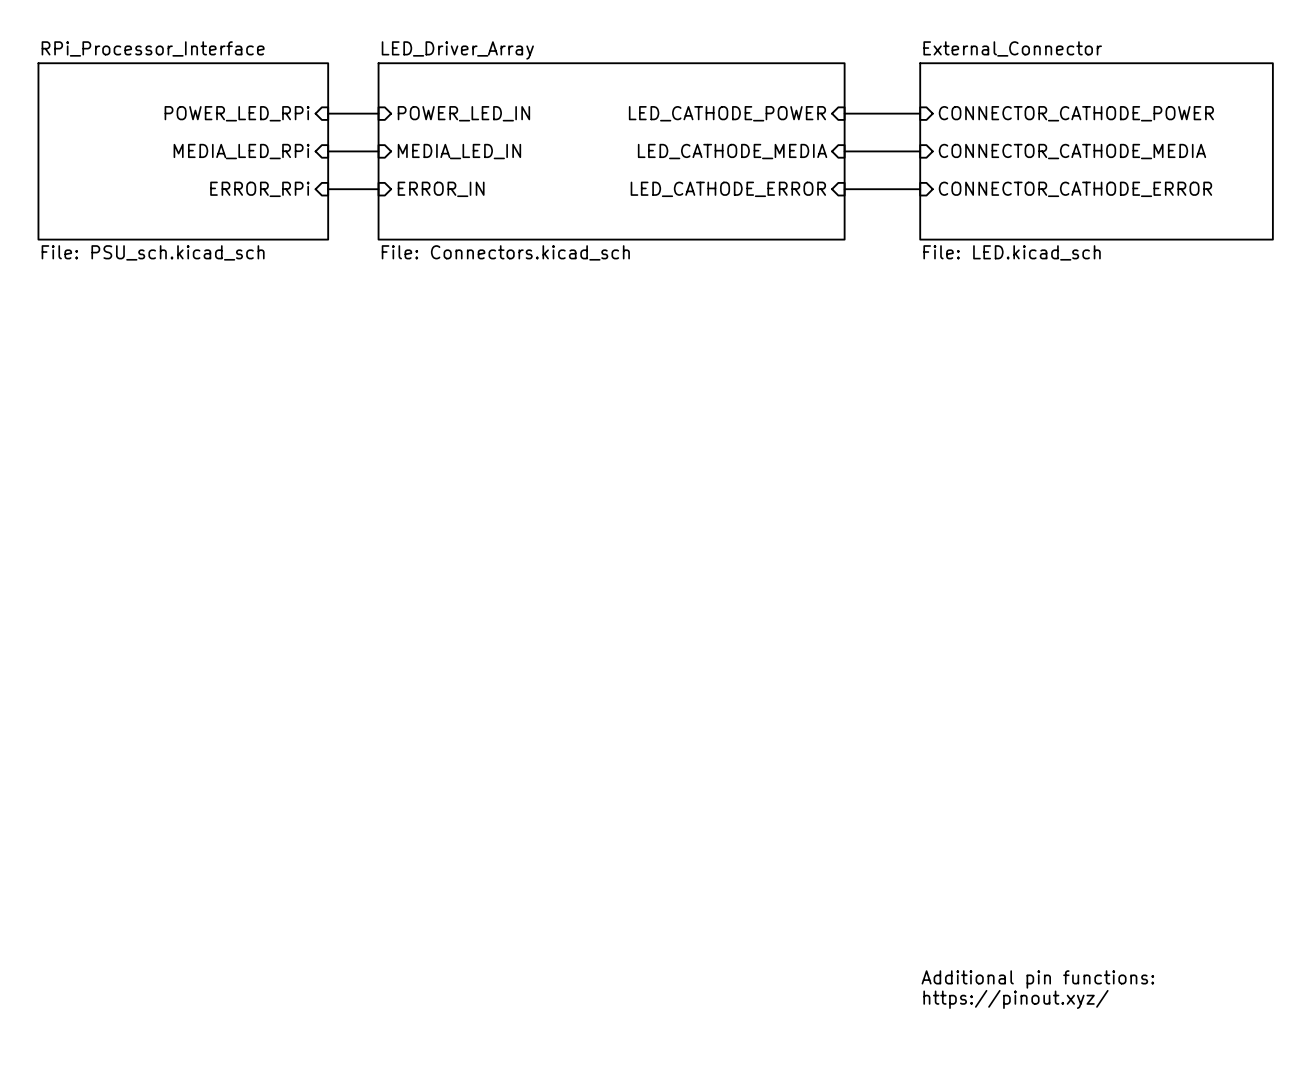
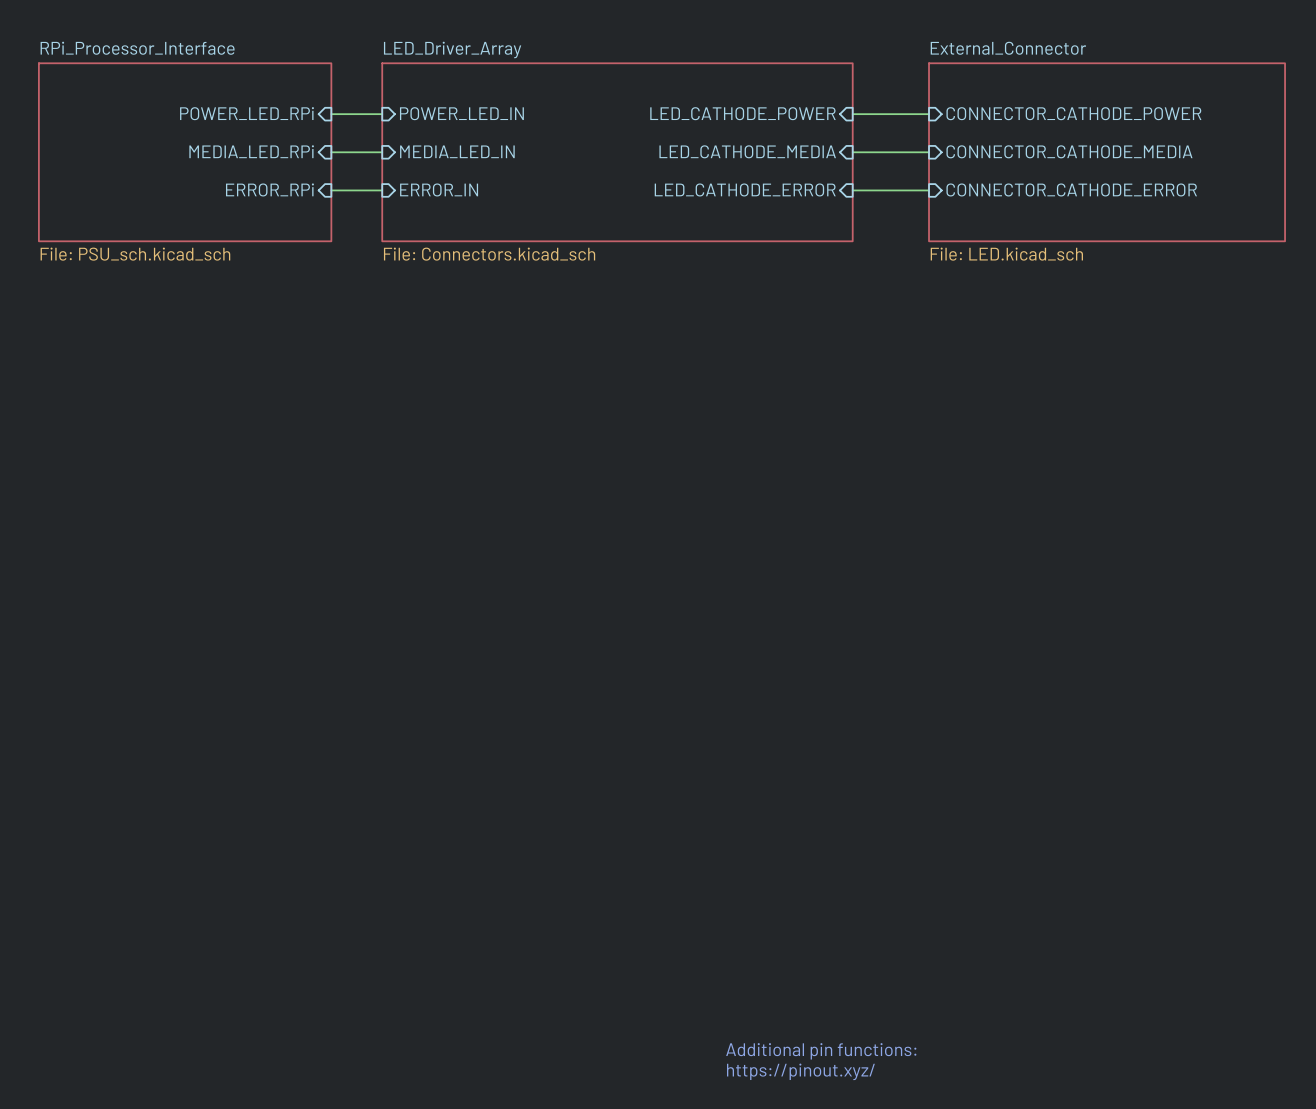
text position: Additional pin functions: (1037, 979) -> Additional pin functions: (821, 1051)
text position: https://pinout.xyz/ (1015, 999) -> https://pinout.xyz/ (800, 1071)

